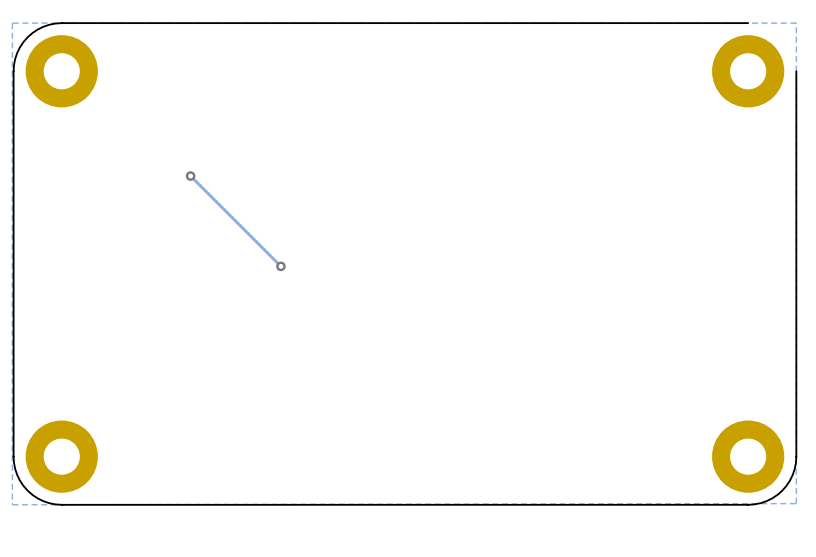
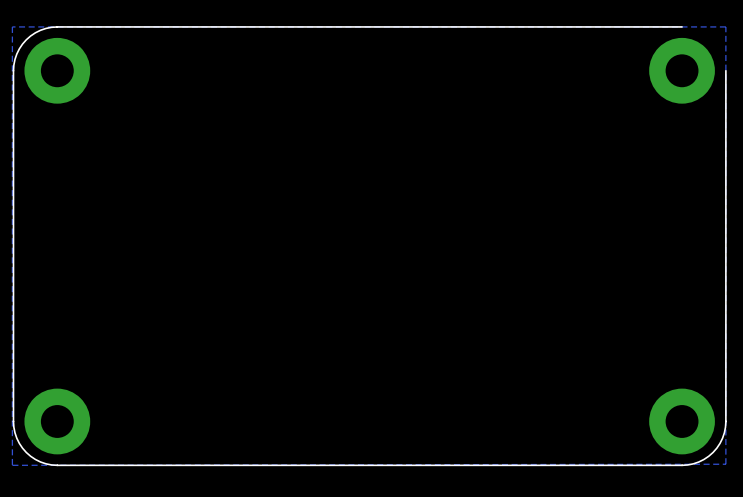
track: (190, 176) (280, 266) -> none
via: (190, 176) -> none
via: (280, 266) -> none

